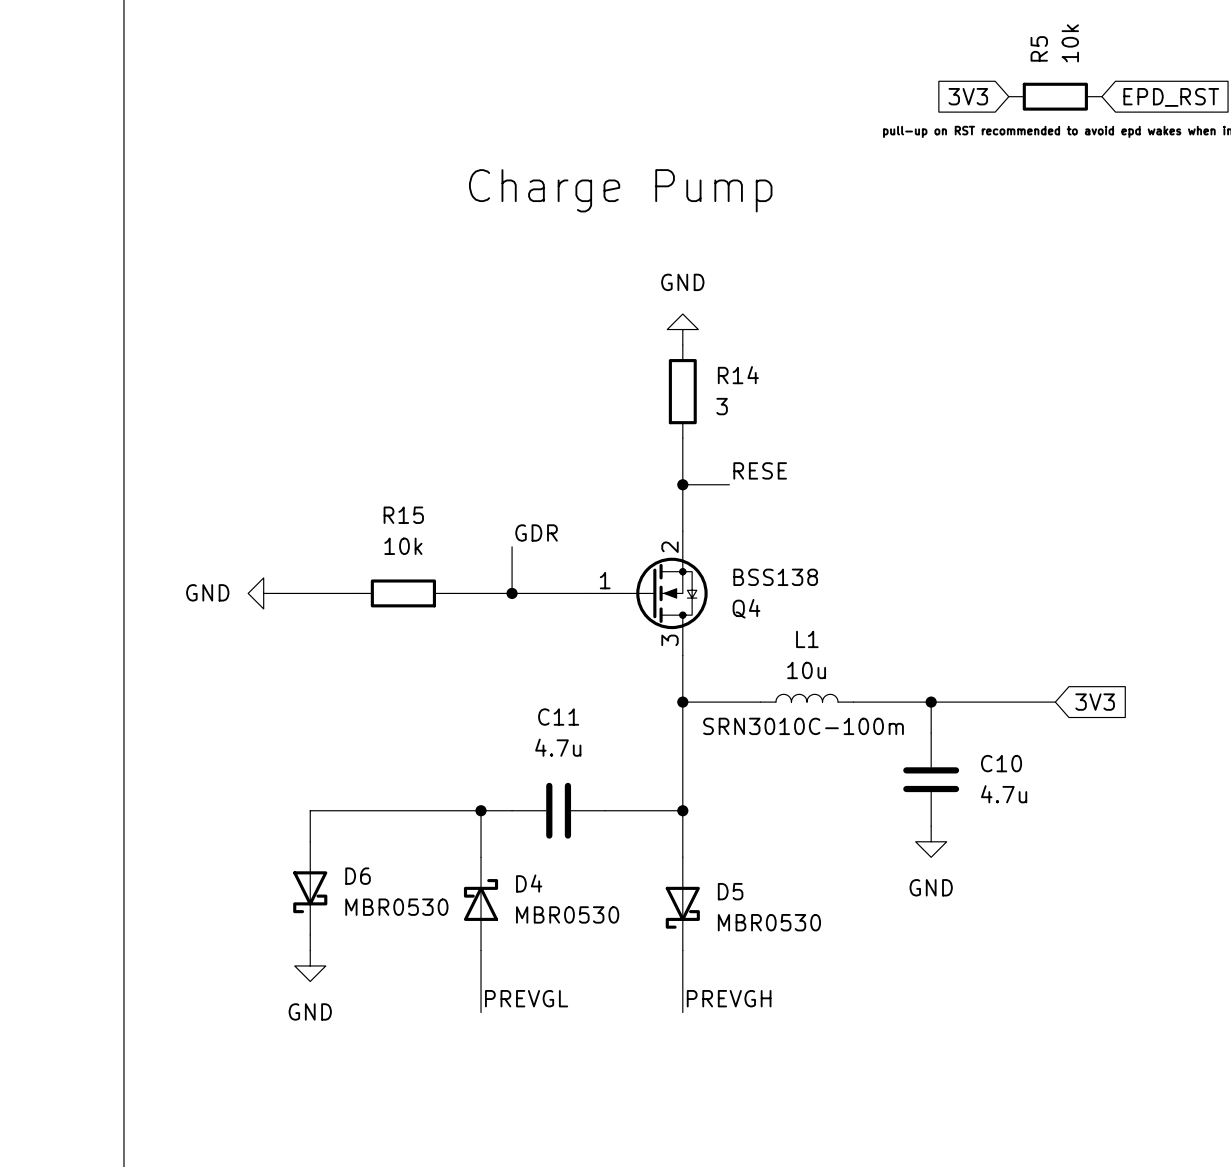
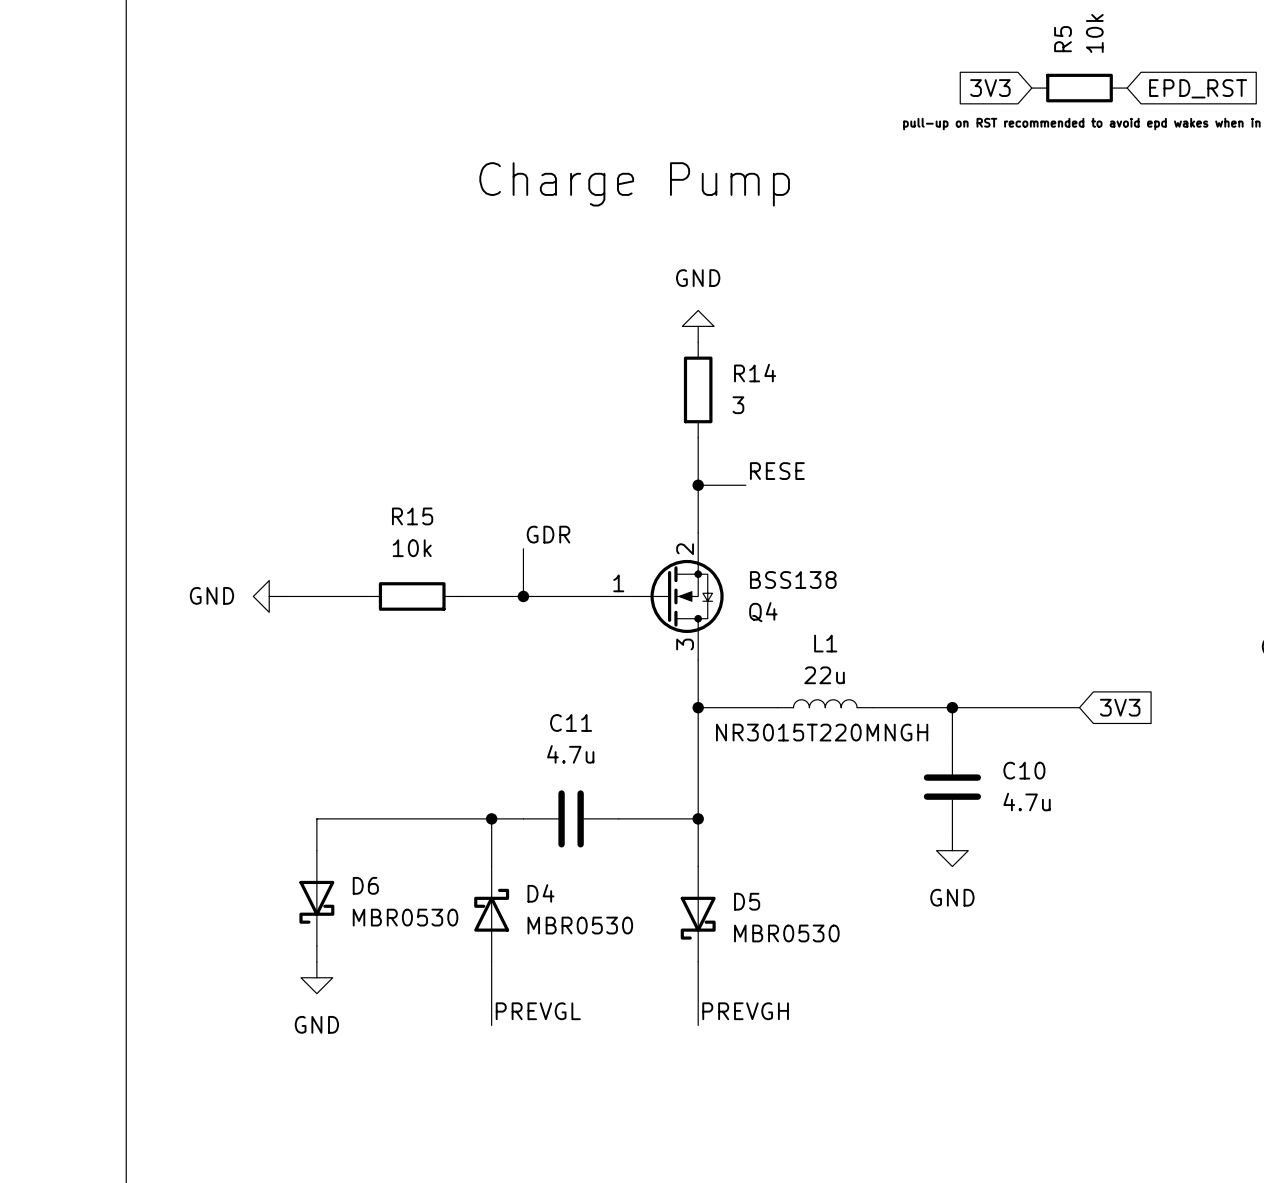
L1 value: 10u (806, 670) -> 22u (824, 675)
text: SRN3010C-100m (803, 726) -> NR3015T220MNGH (822, 732)

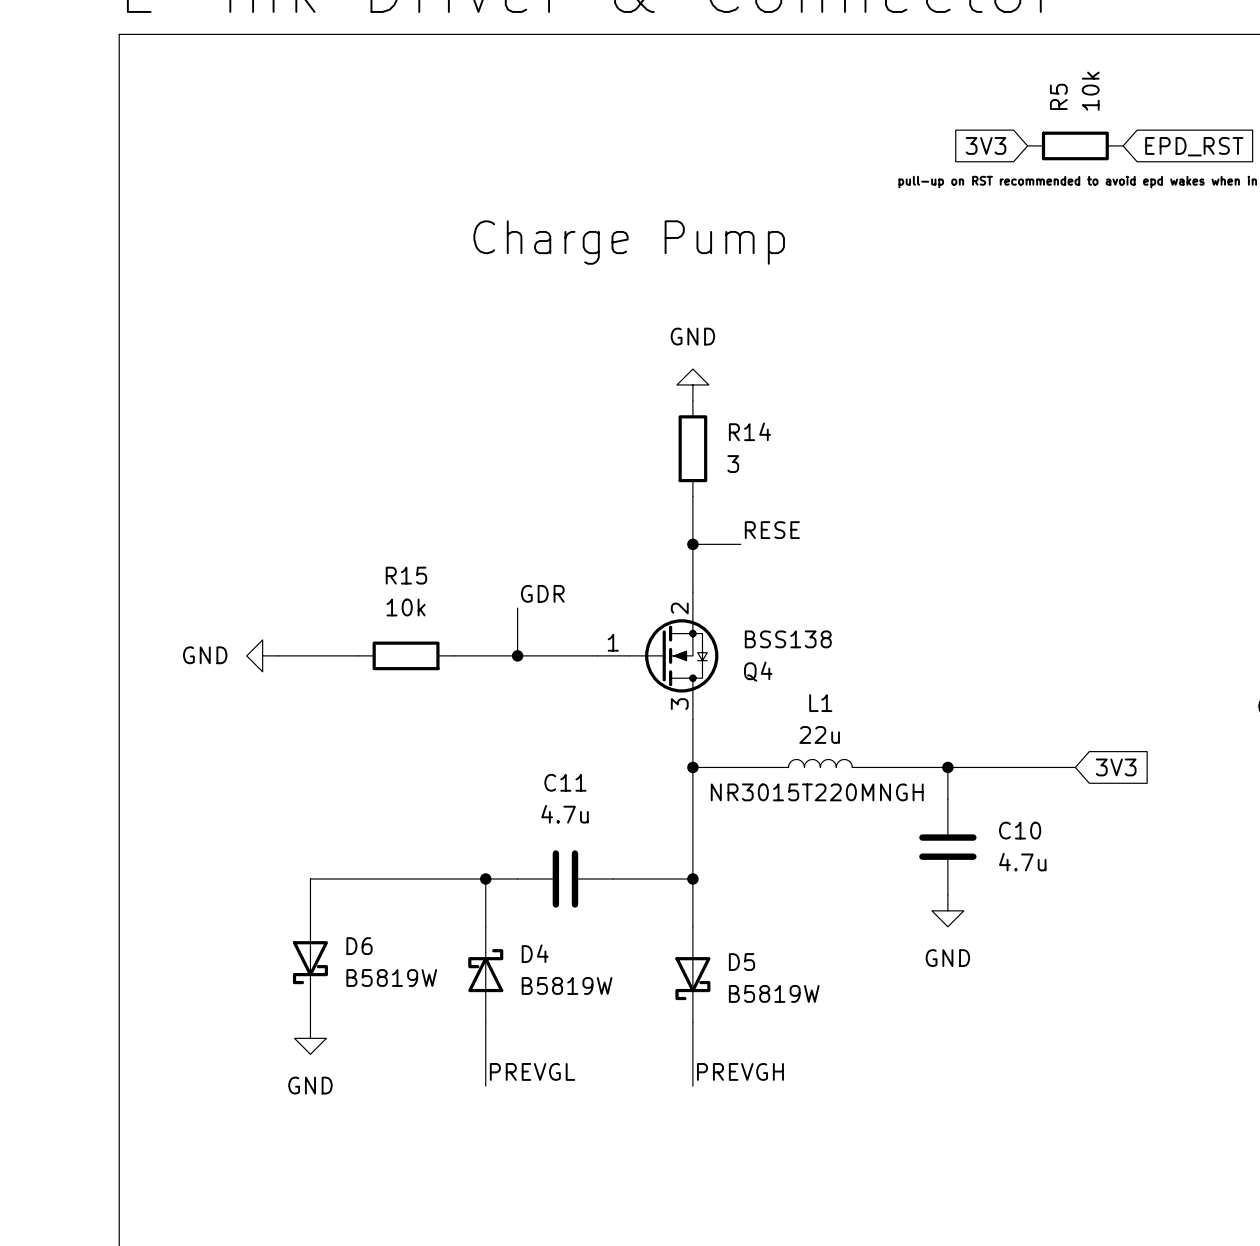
D6 value: MBR0530 (405, 917) -> B5819W (391, 977)
D4 value: MBR0530 (580, 925) -> B5819W (567, 985)
D5 value: MBR0530 (786, 933) -> B5819W (774, 993)

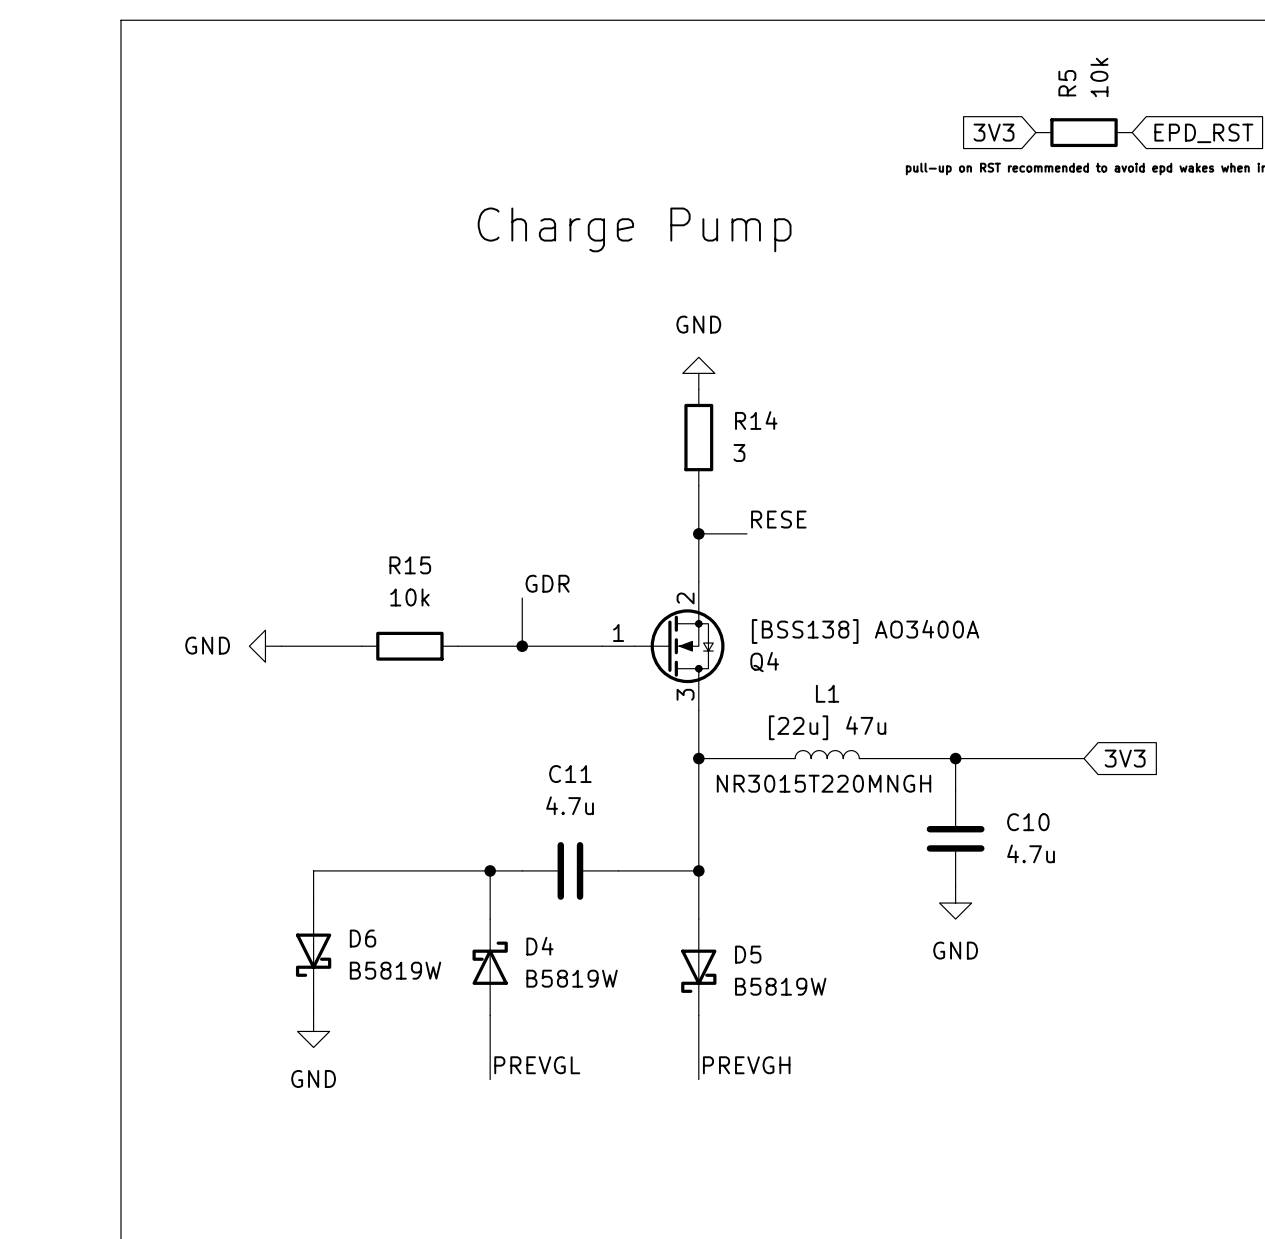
Q4 value: BSS138 (788, 639) -> [BSS138] AO3400A (865, 631)
L1 value: 22u (819, 734) -> [22u] 47u (827, 727)

